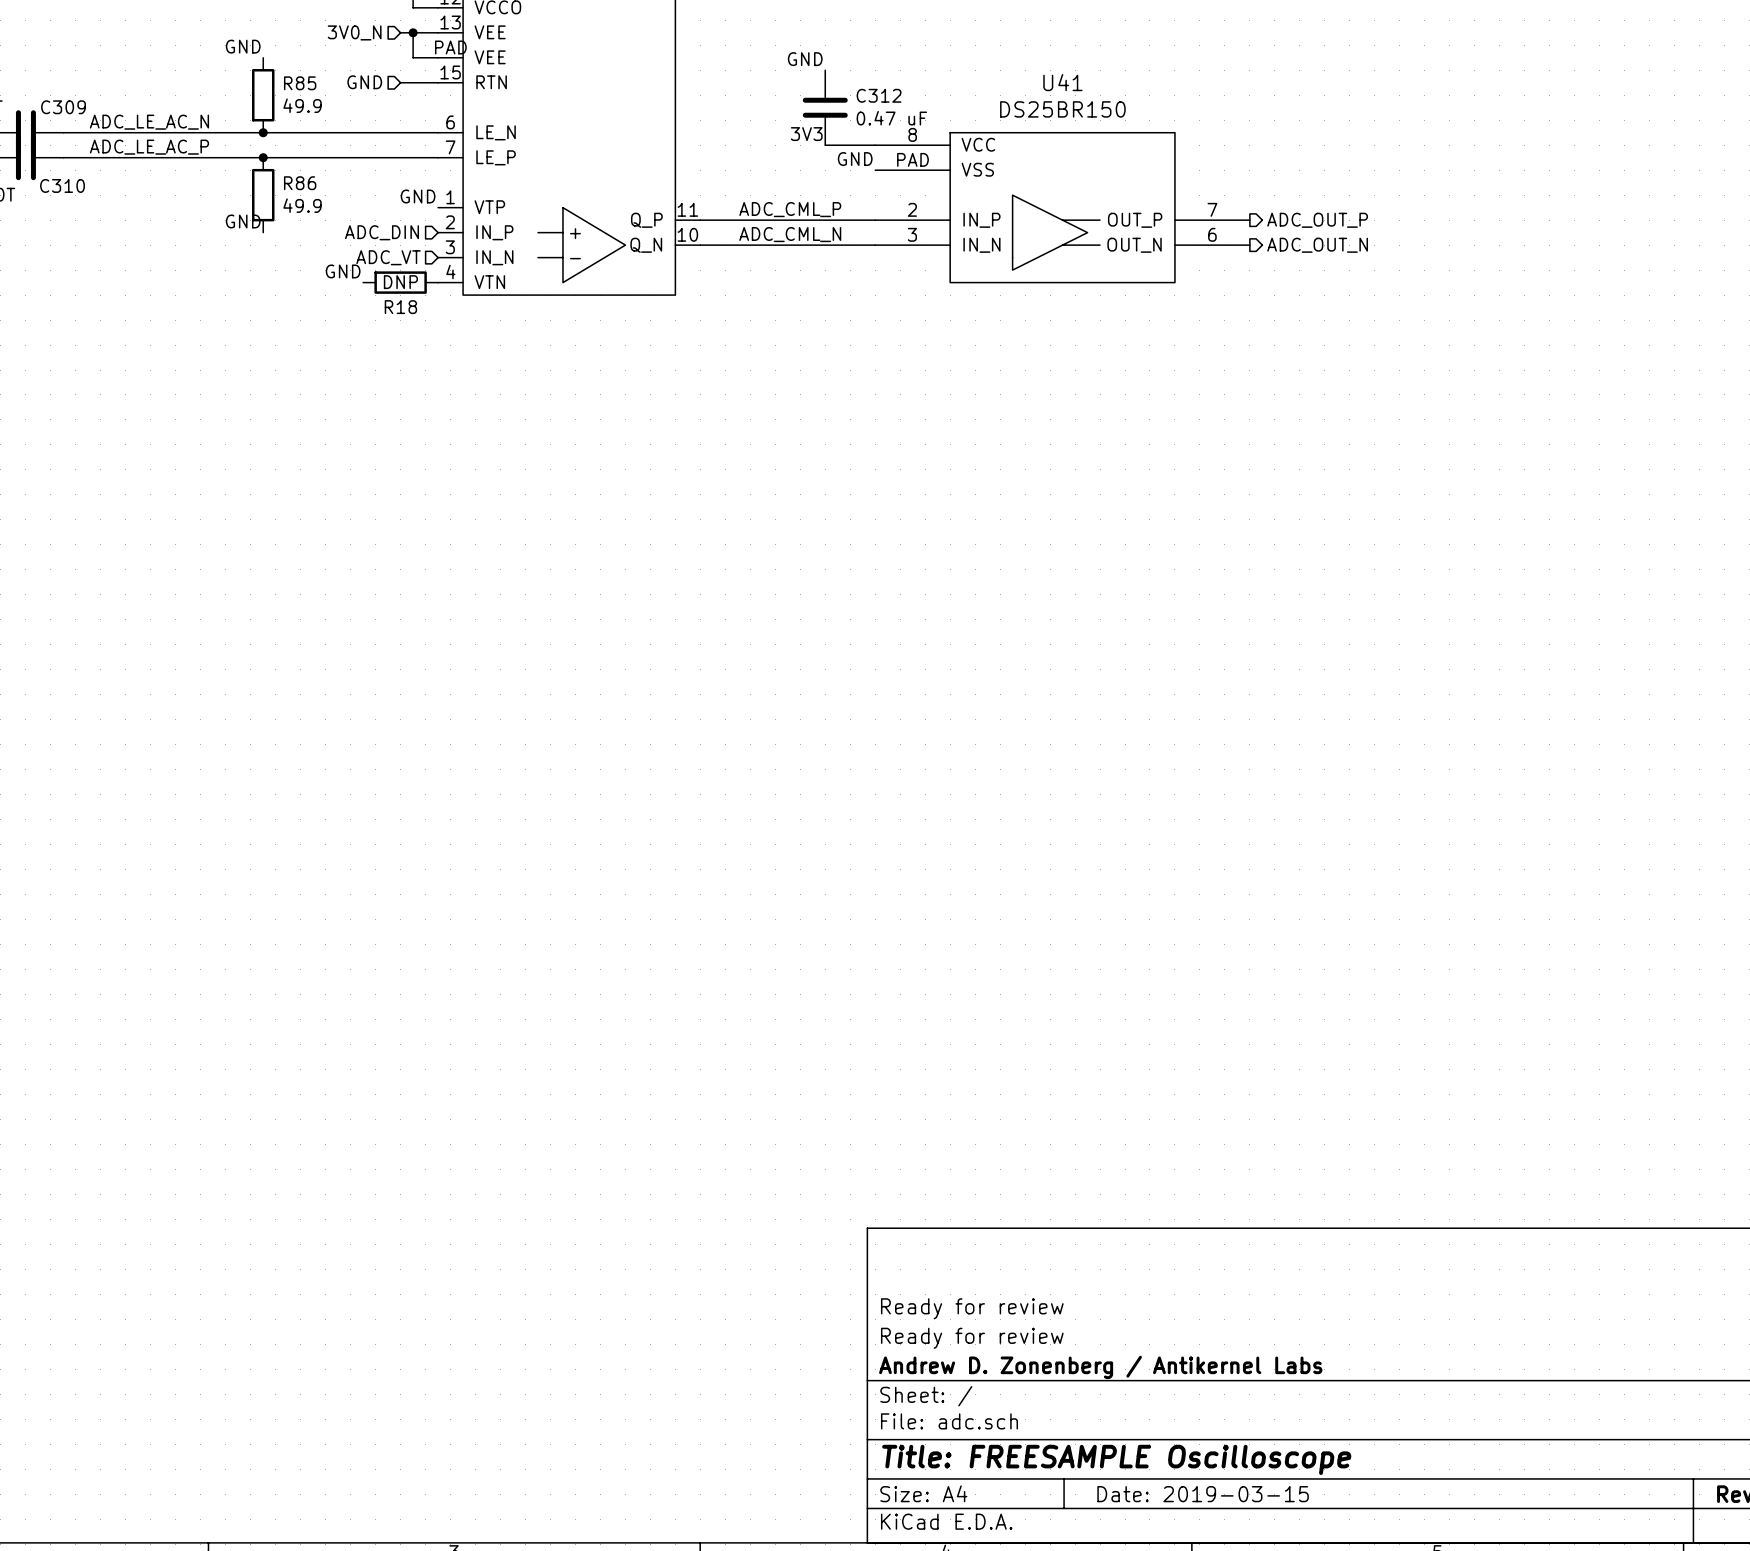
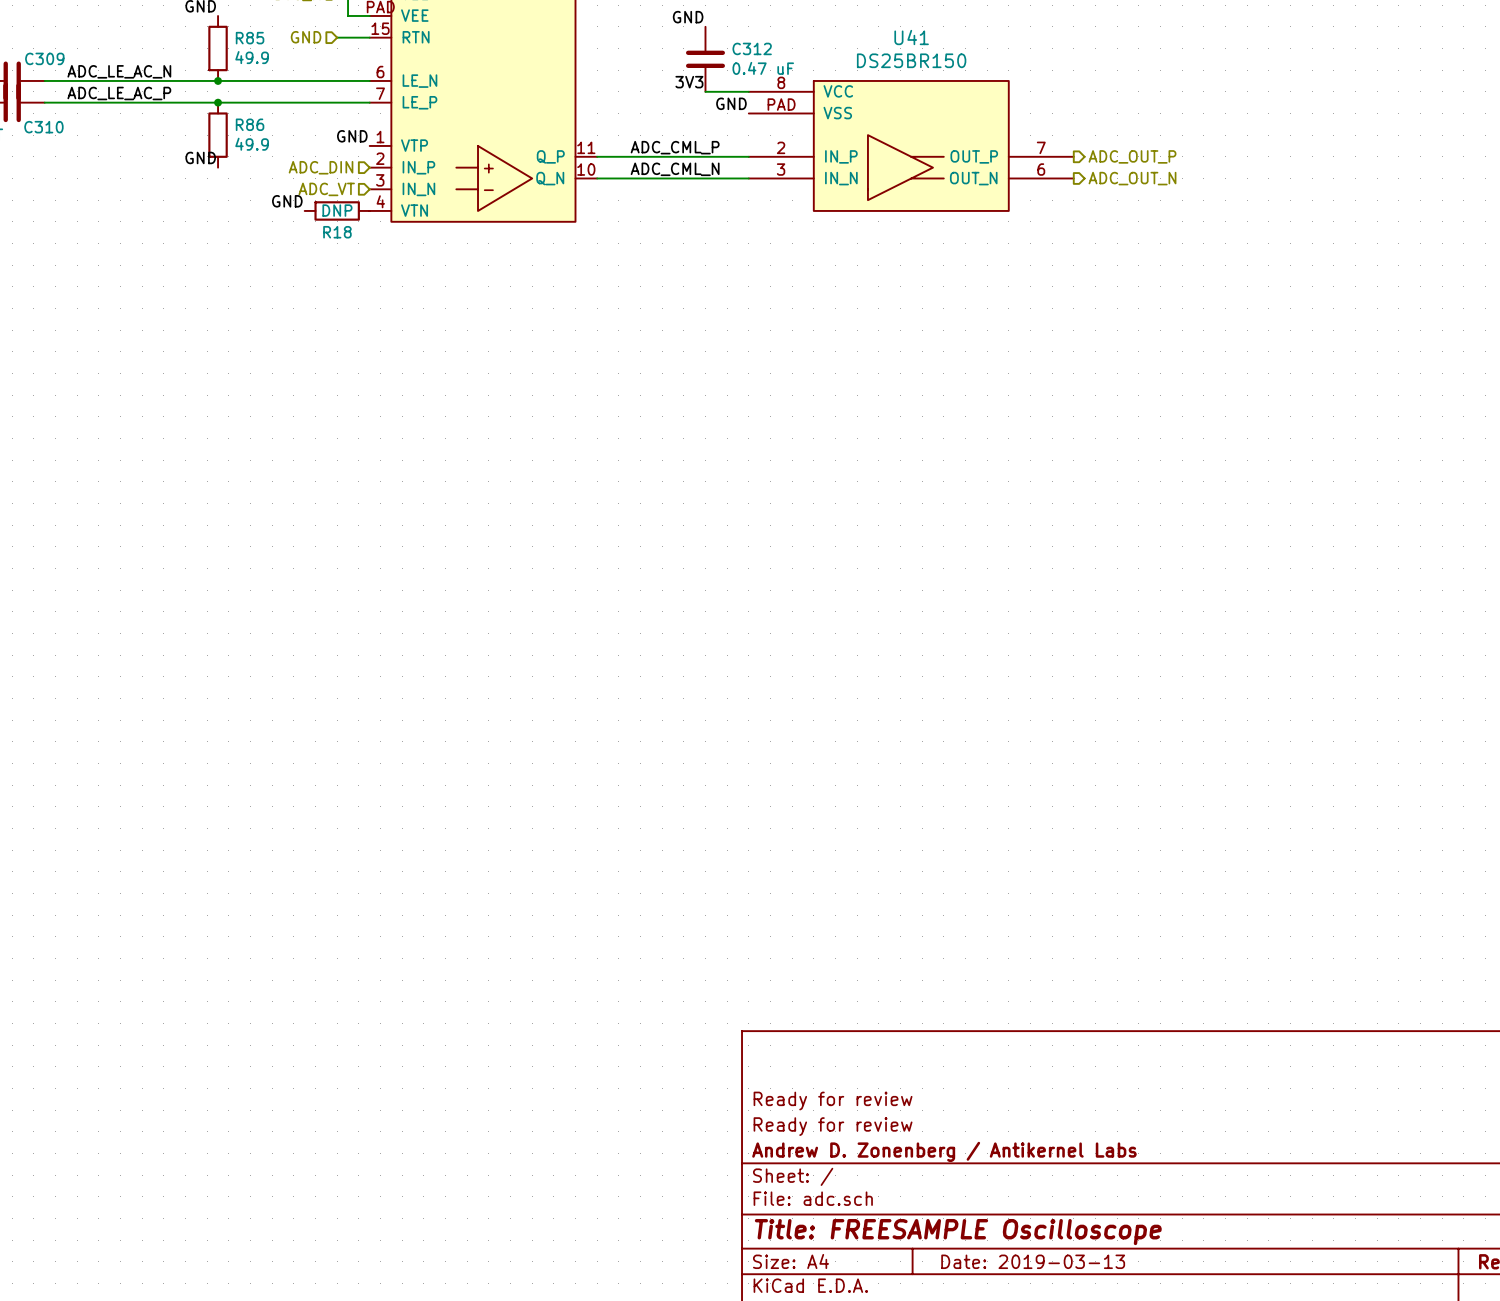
title block: Date: 2019-03-15 (1203, 1494) -> Date: 2019-03-13 (1033, 1261)

